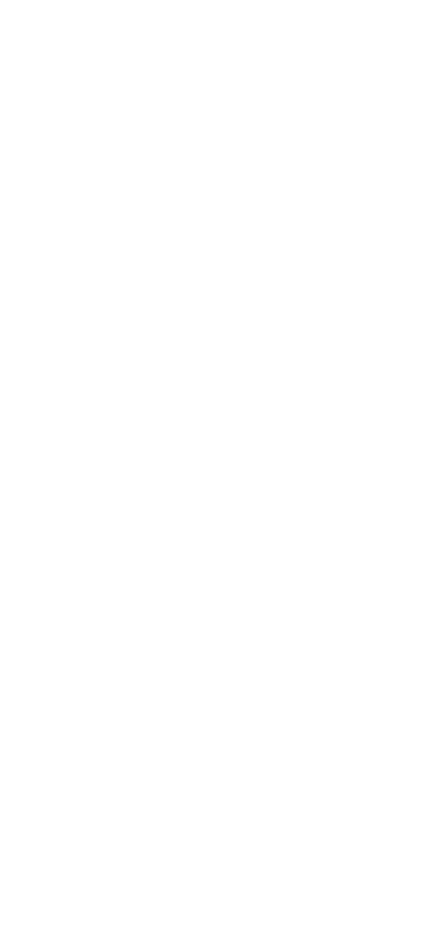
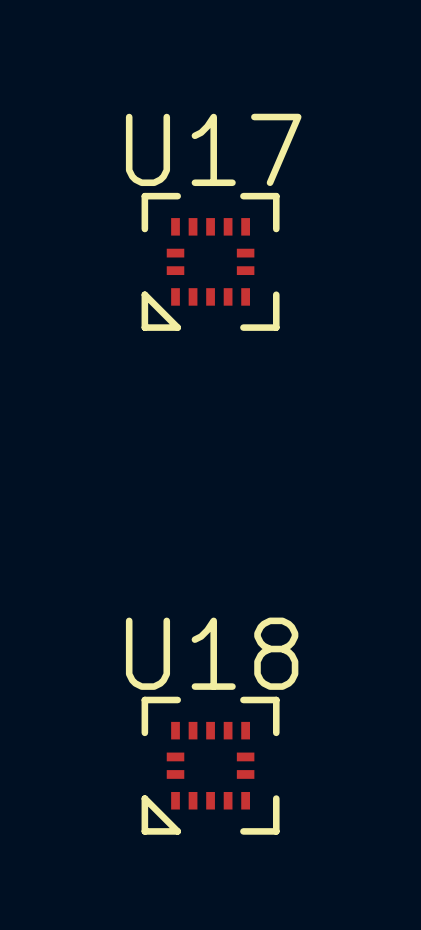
U17: none -> (210, 261)
U18: none -> (210, 765)

